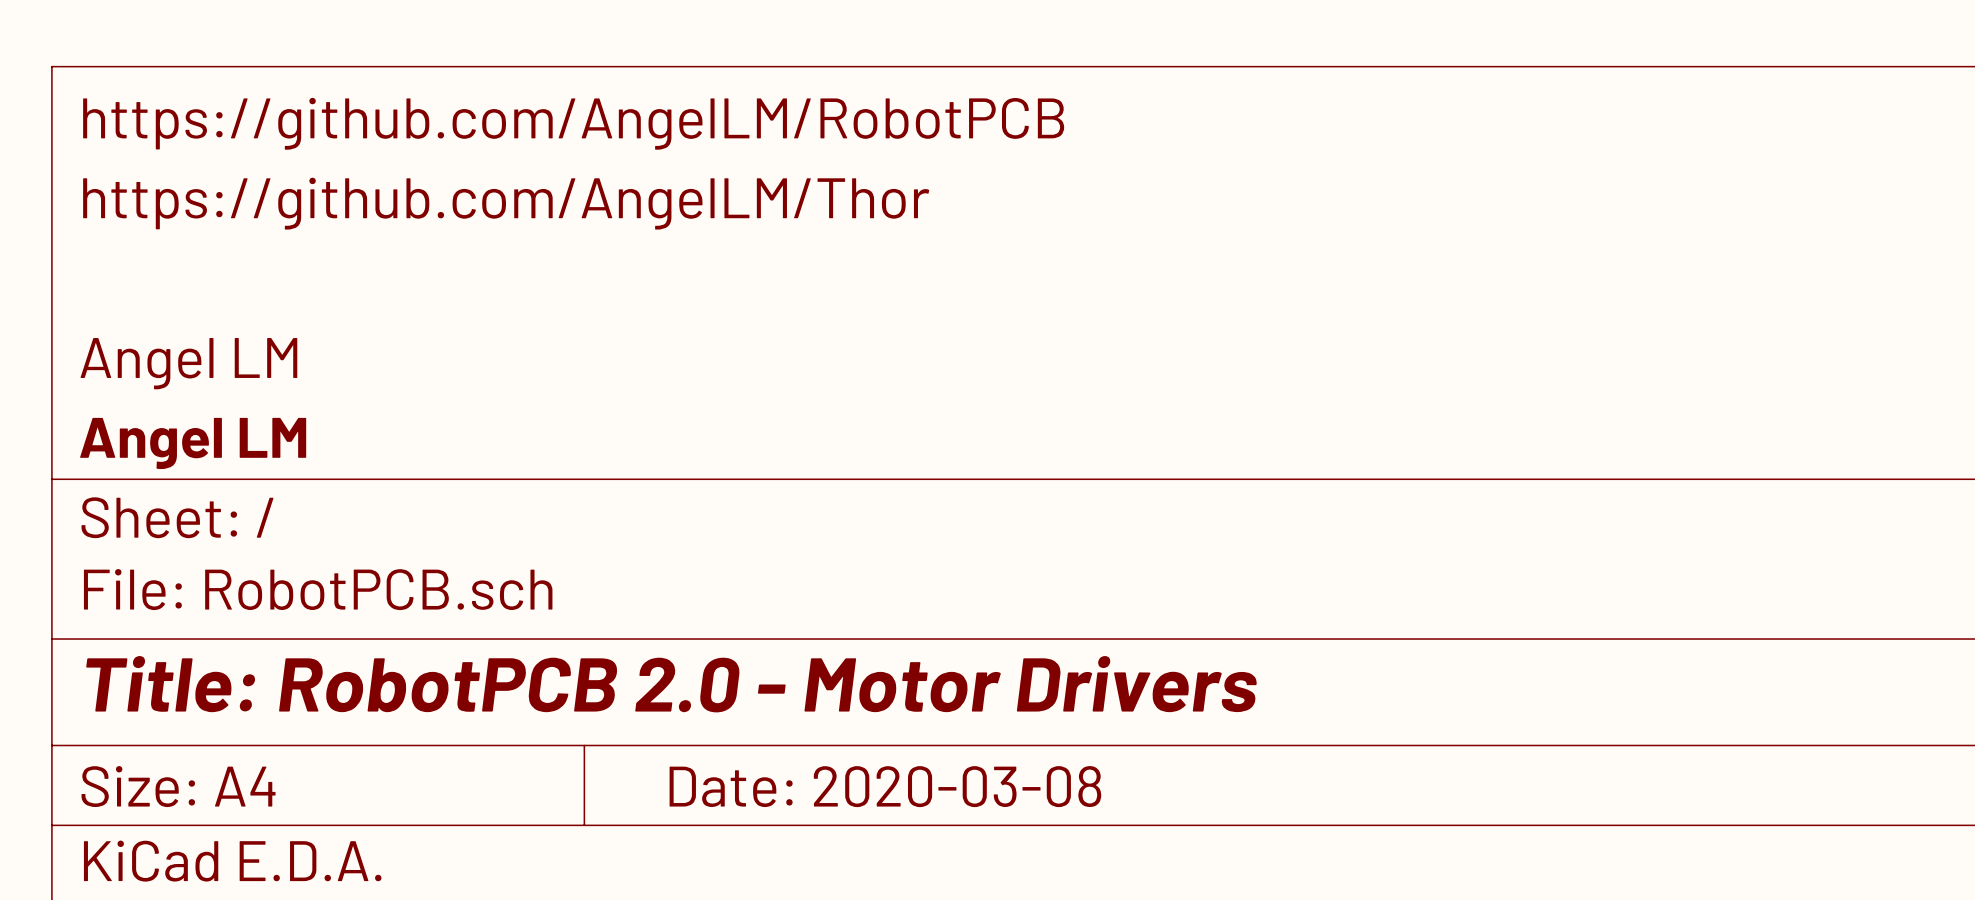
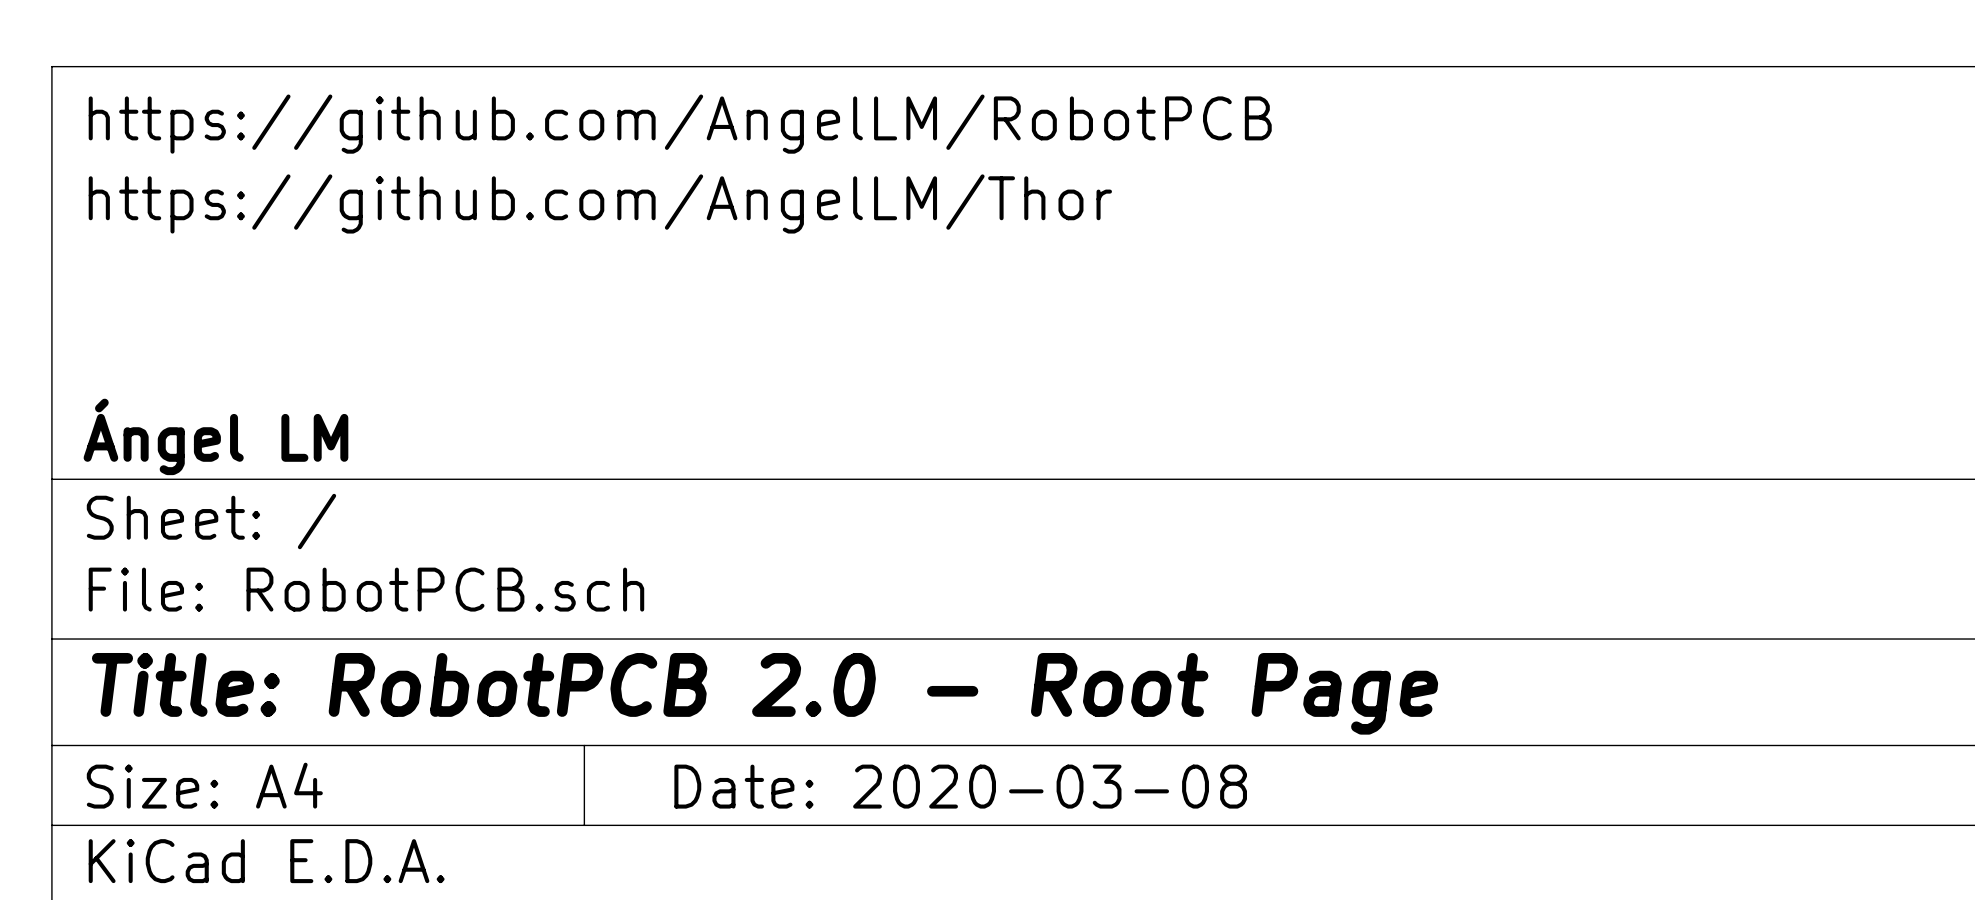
title block: Angel LM (188, 363) -> none
title block: Angel LM (193, 443) -> Ángel LM (215, 436)
title block: Title: RobotPCB 2.0 - Motor Drivers (671, 684) -> Title: RobotPCB 2.0 - Root Page (765, 693)

